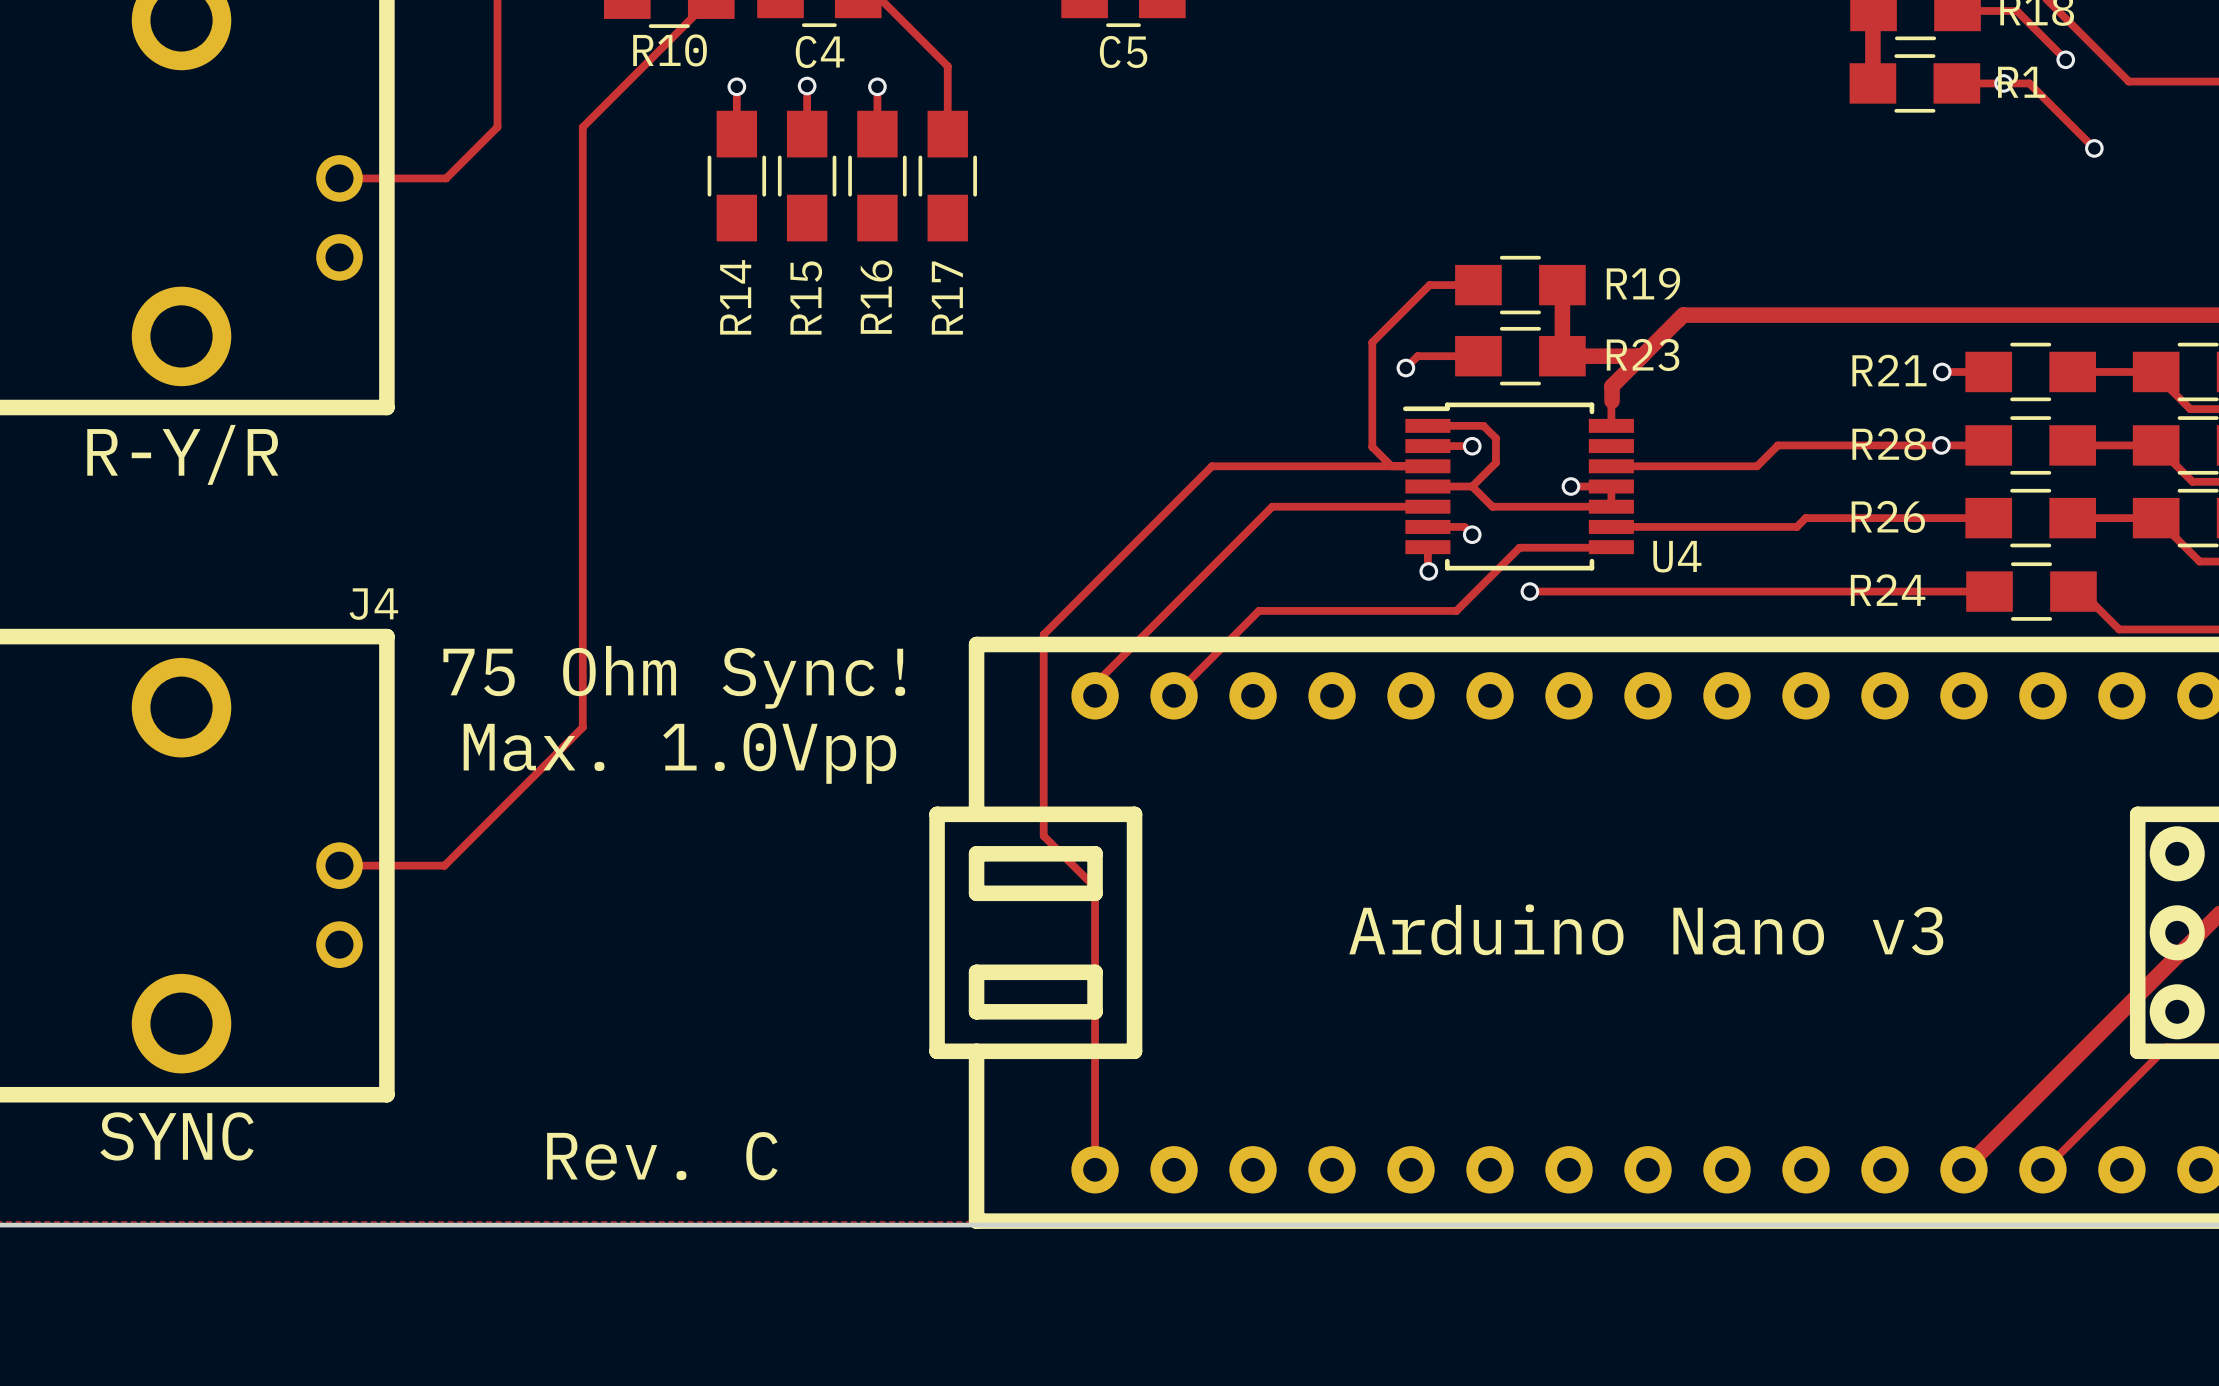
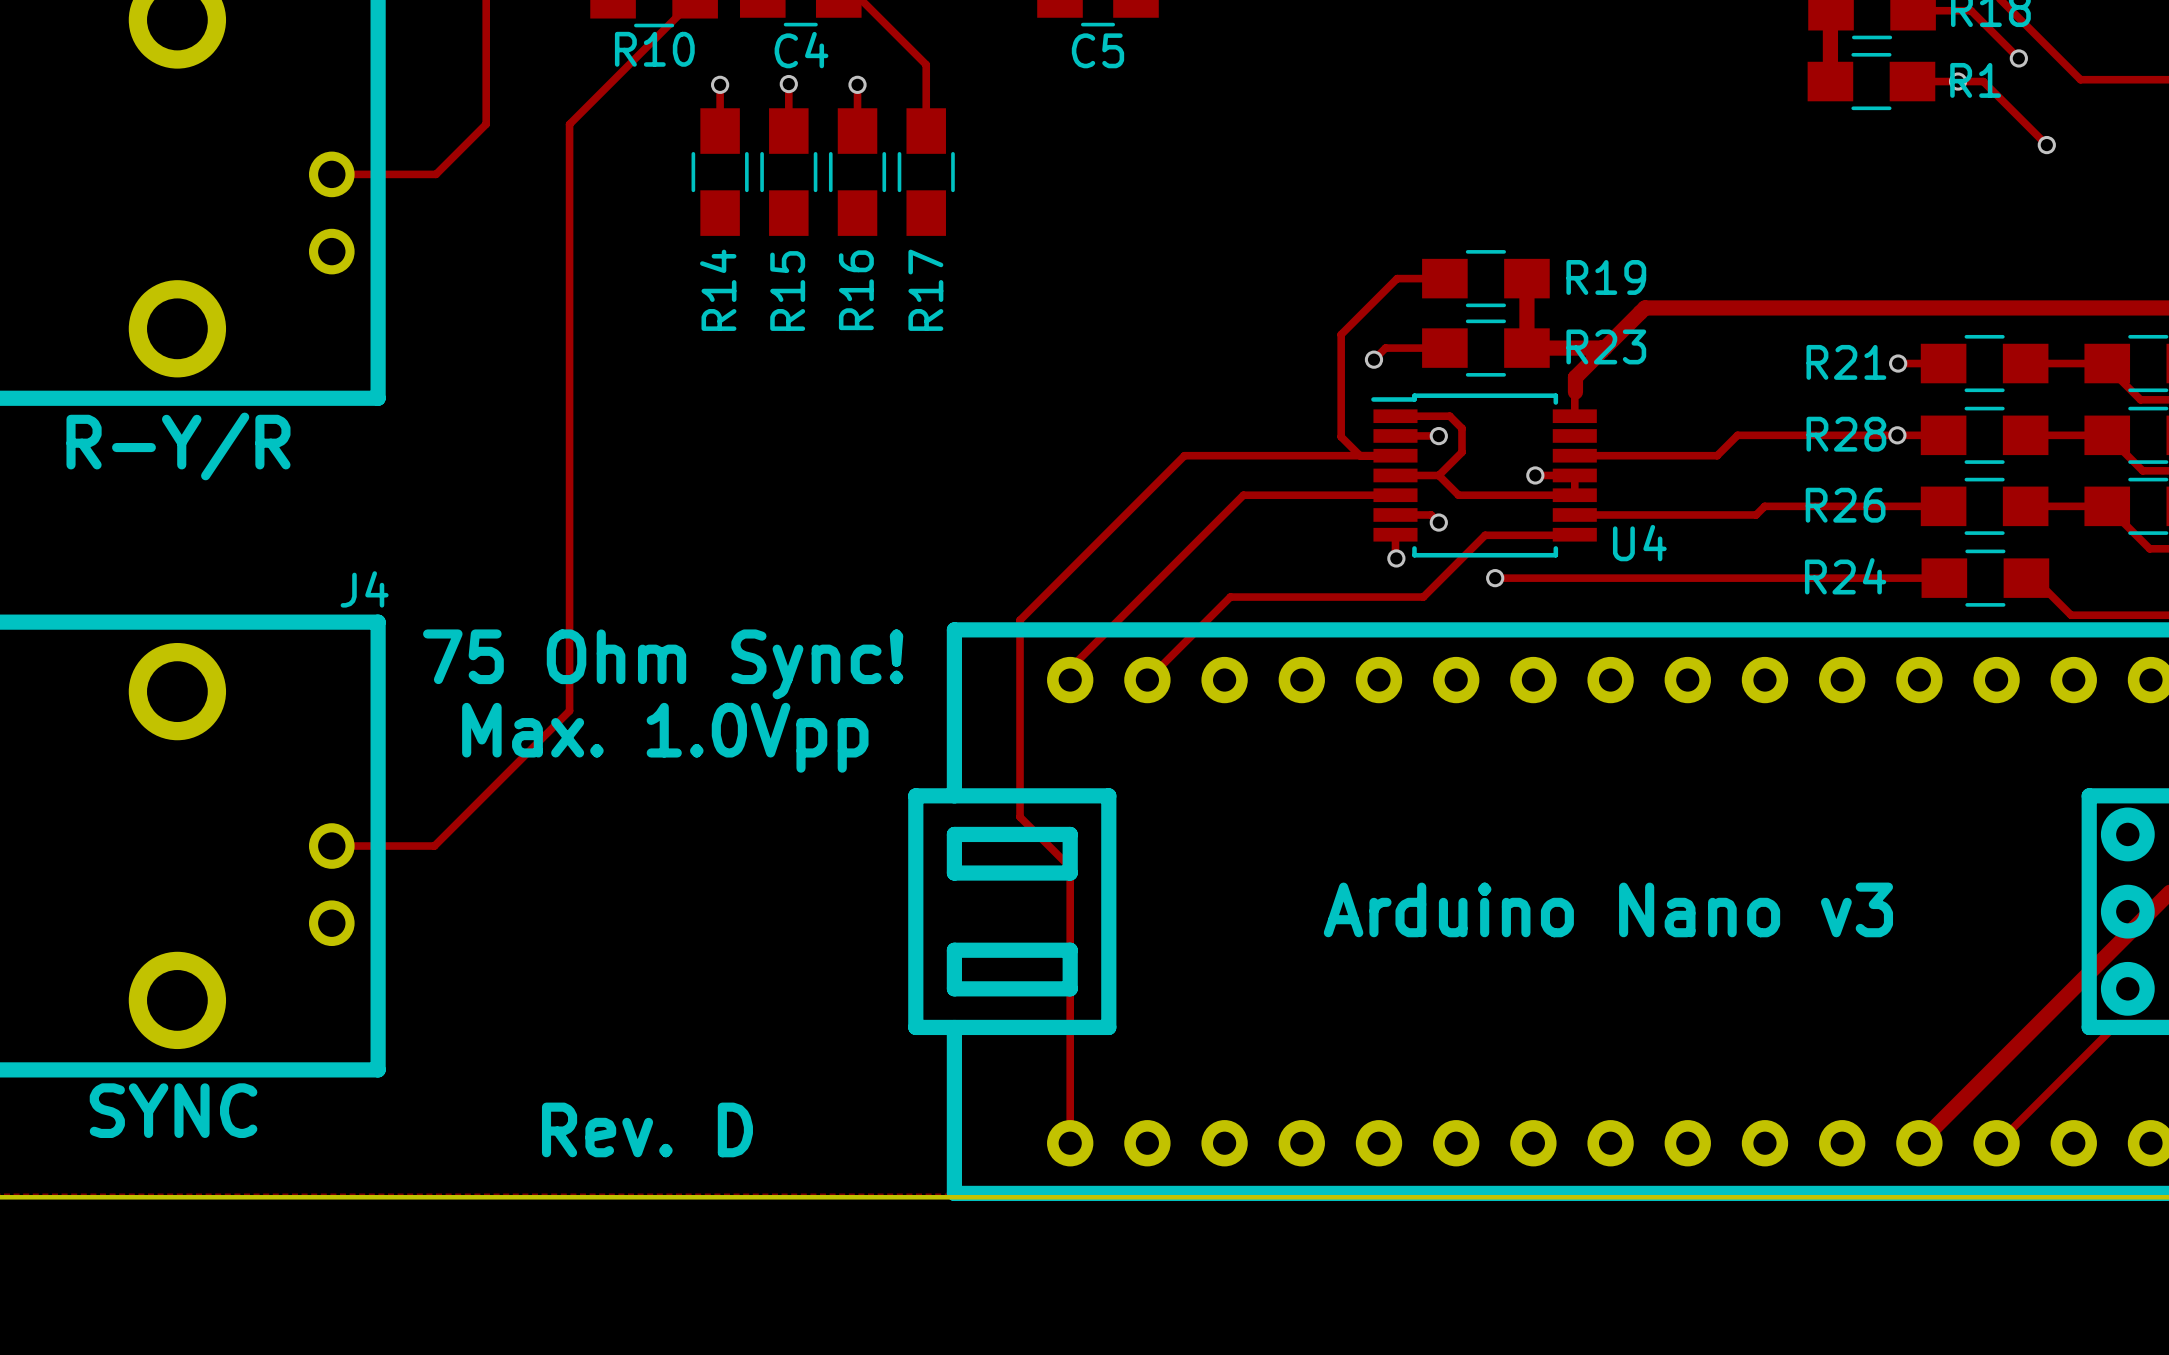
text: Rev. C (662, 1156) -> Rev. D (647, 1129)

